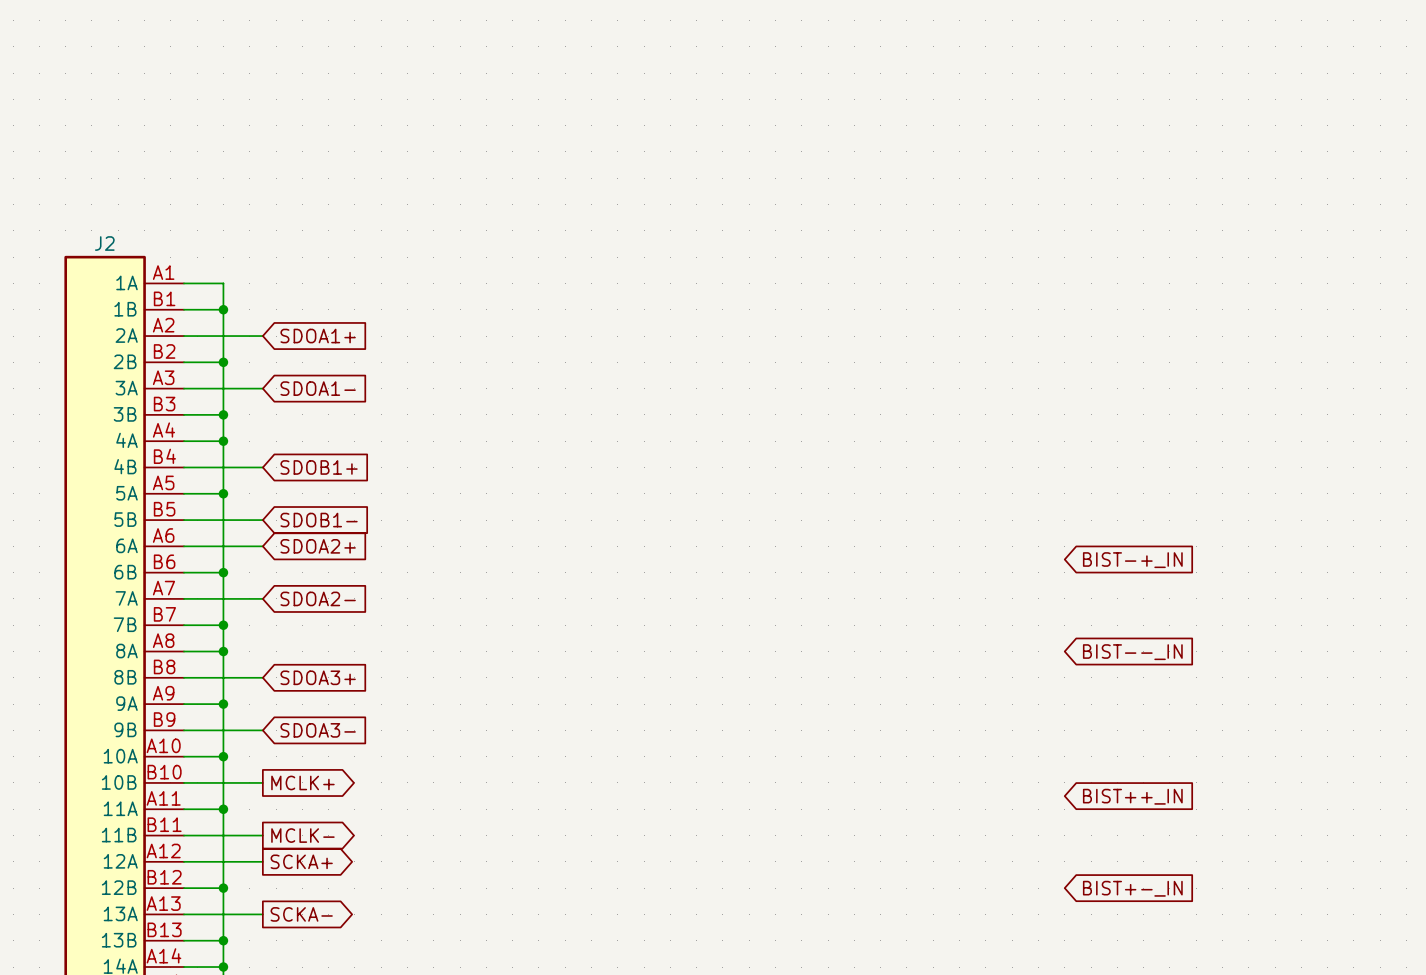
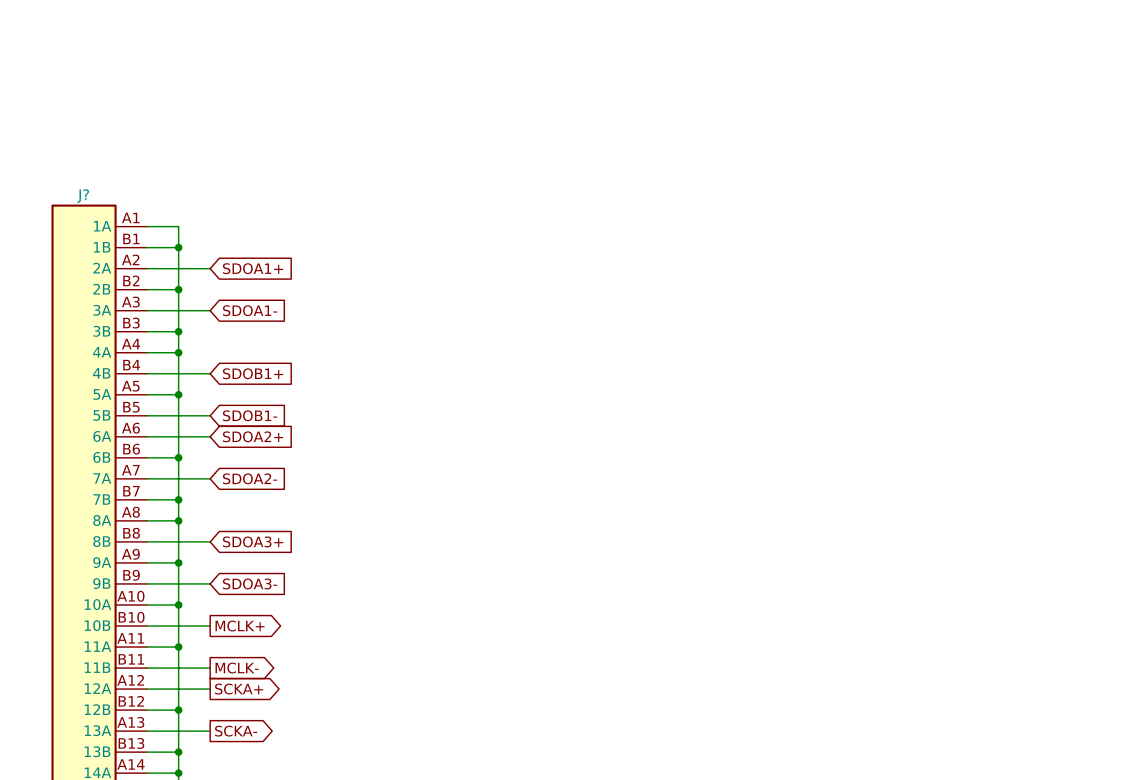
J2 name: J2 (104, 243) -> J? (83, 196)
global label: BIST-+_IN (1132, 560) -> none
global label: BIST--_IN (1132, 652) -> none
global label: BIST++_IN (1132, 796) -> none
global label: BIST+-_IN (1132, 888) -> none

